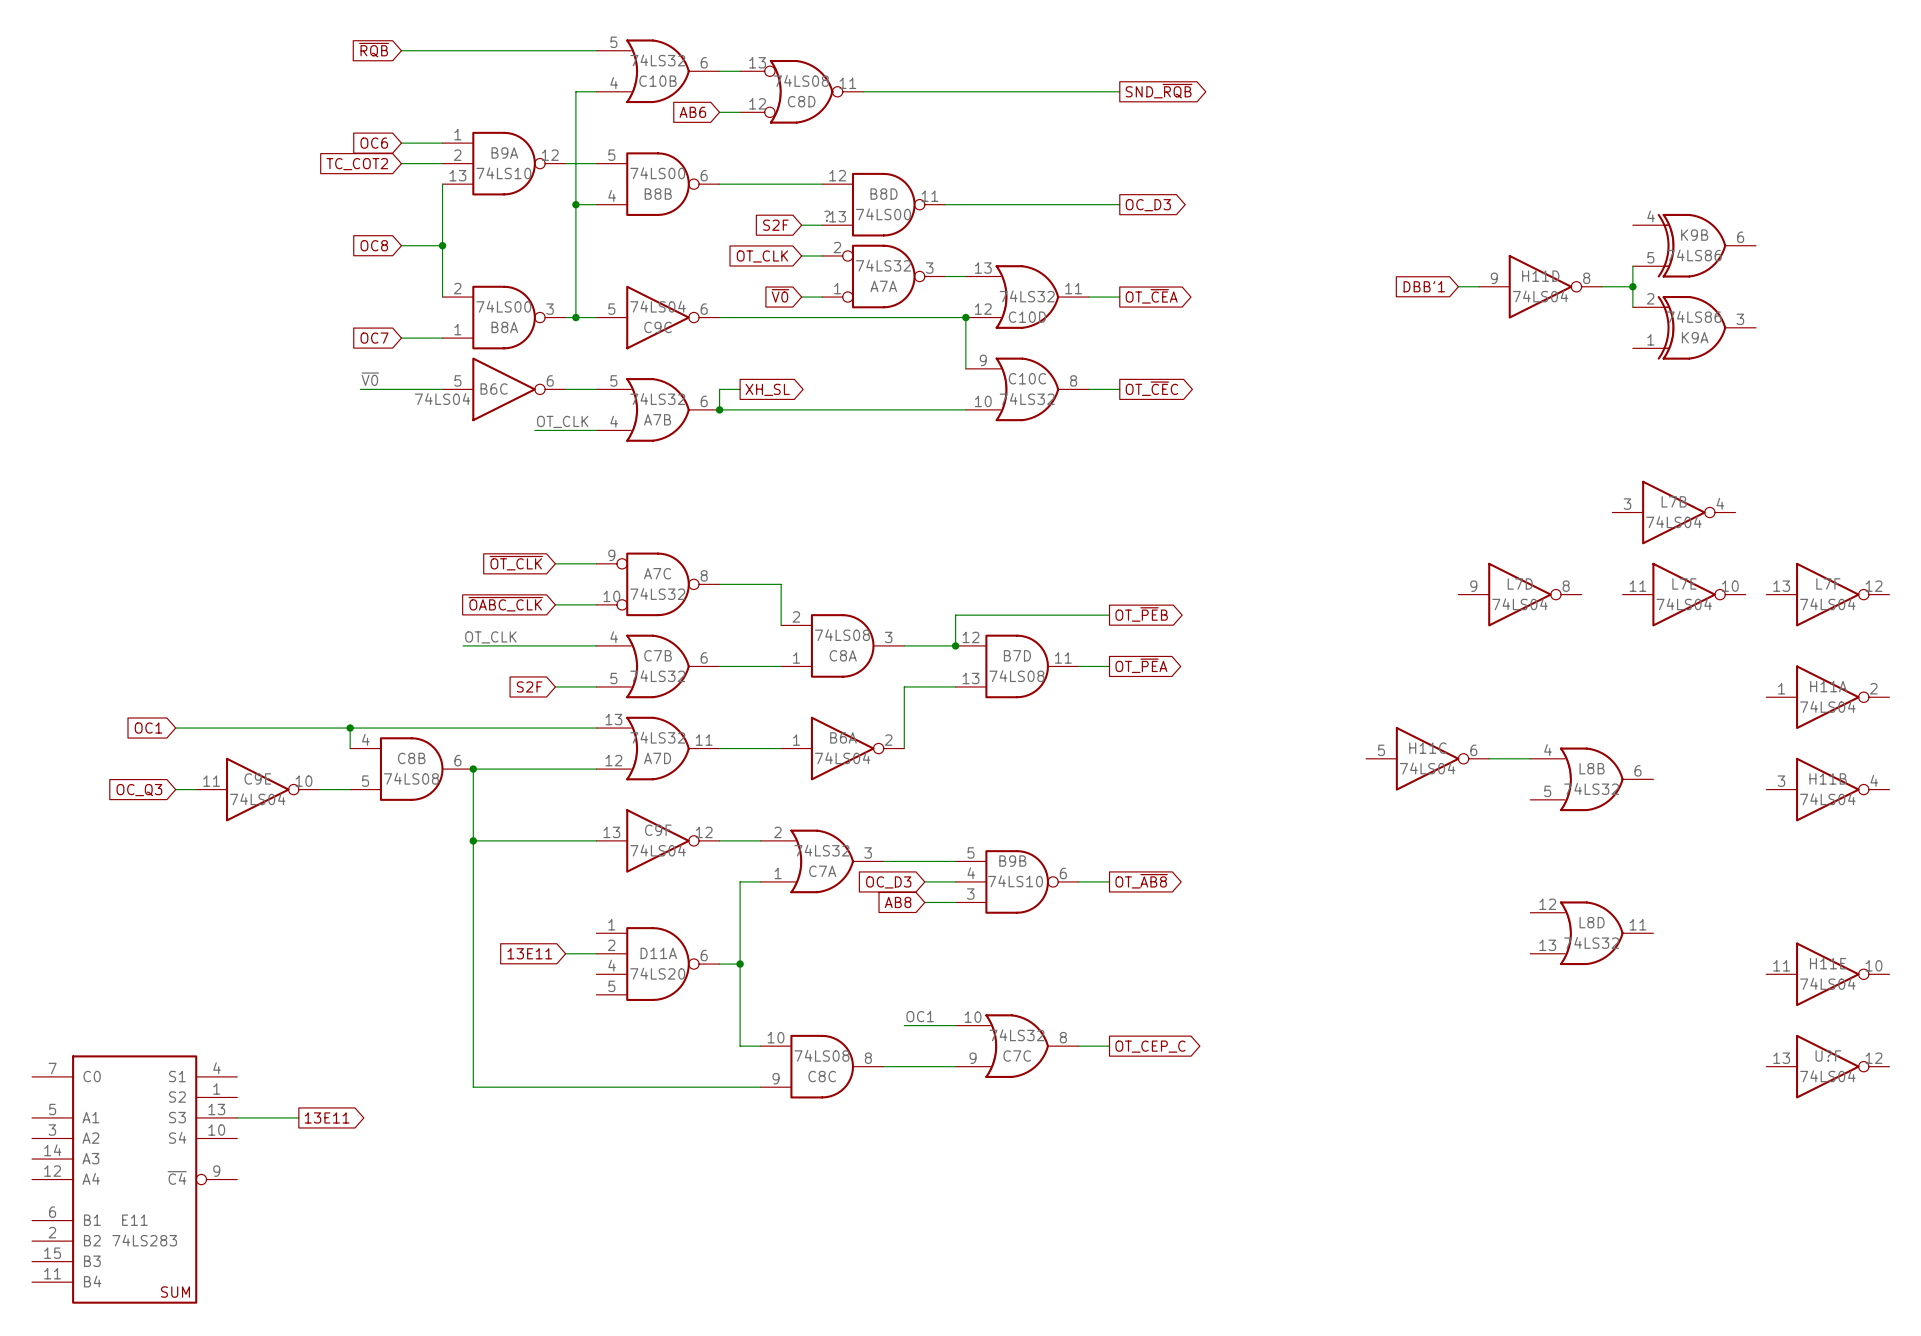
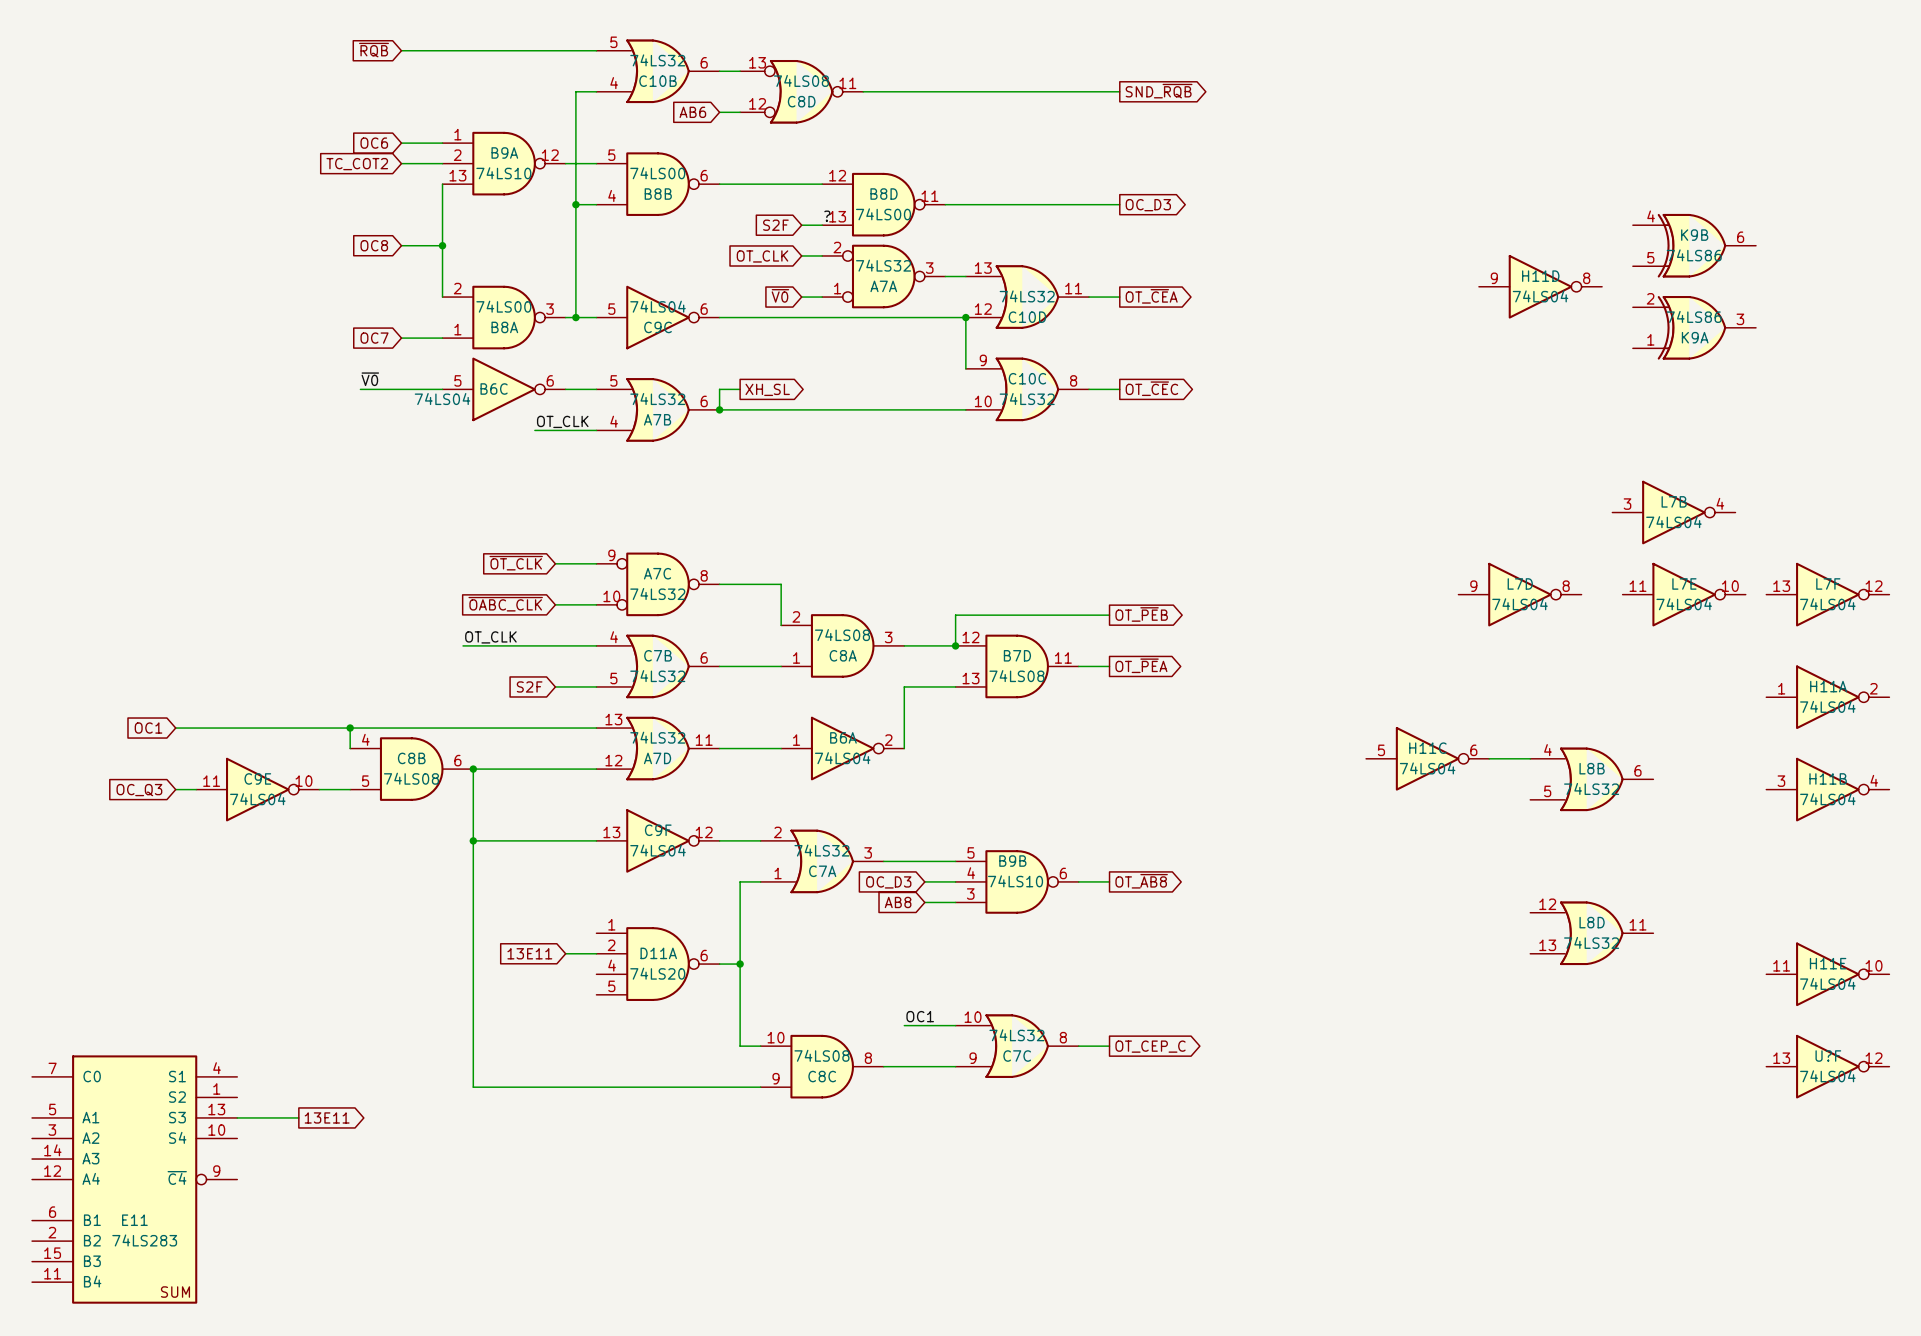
wire: (1632, 266) (1632, 307) -> none
global label: DBB'1 (1424, 286) -> none
wire: (1458, 286) (1478, 286) -> none
wire: (1602, 286) (1632, 286) -> none
junction: (1632, 286) -> none

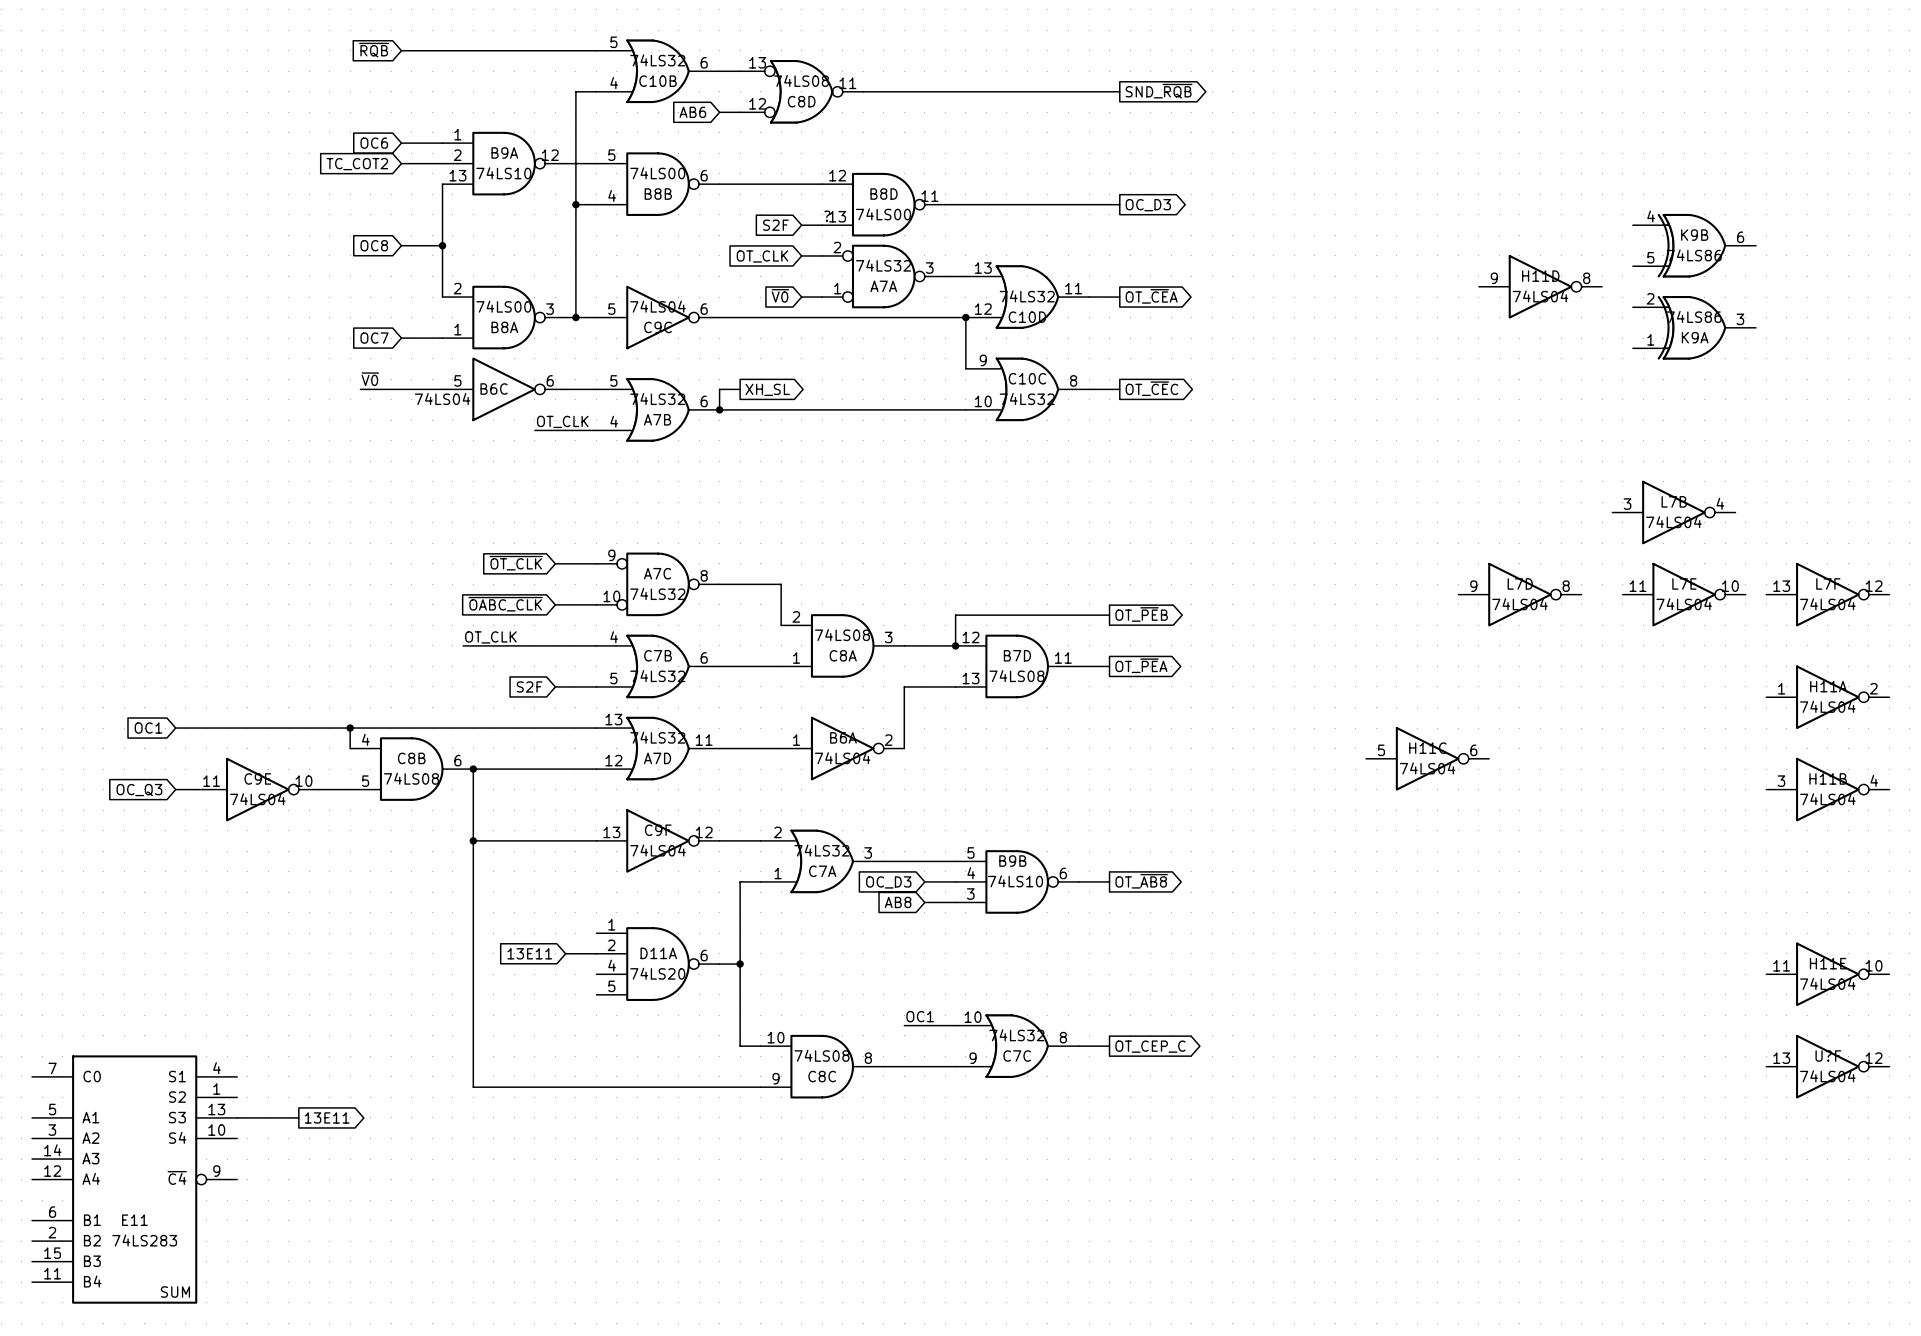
wire: (1489, 758) (1530, 758) -> none
L8B: 74LS32 (1591, 779) -> none
L8D: 74LS32 (1591, 933) -> none

